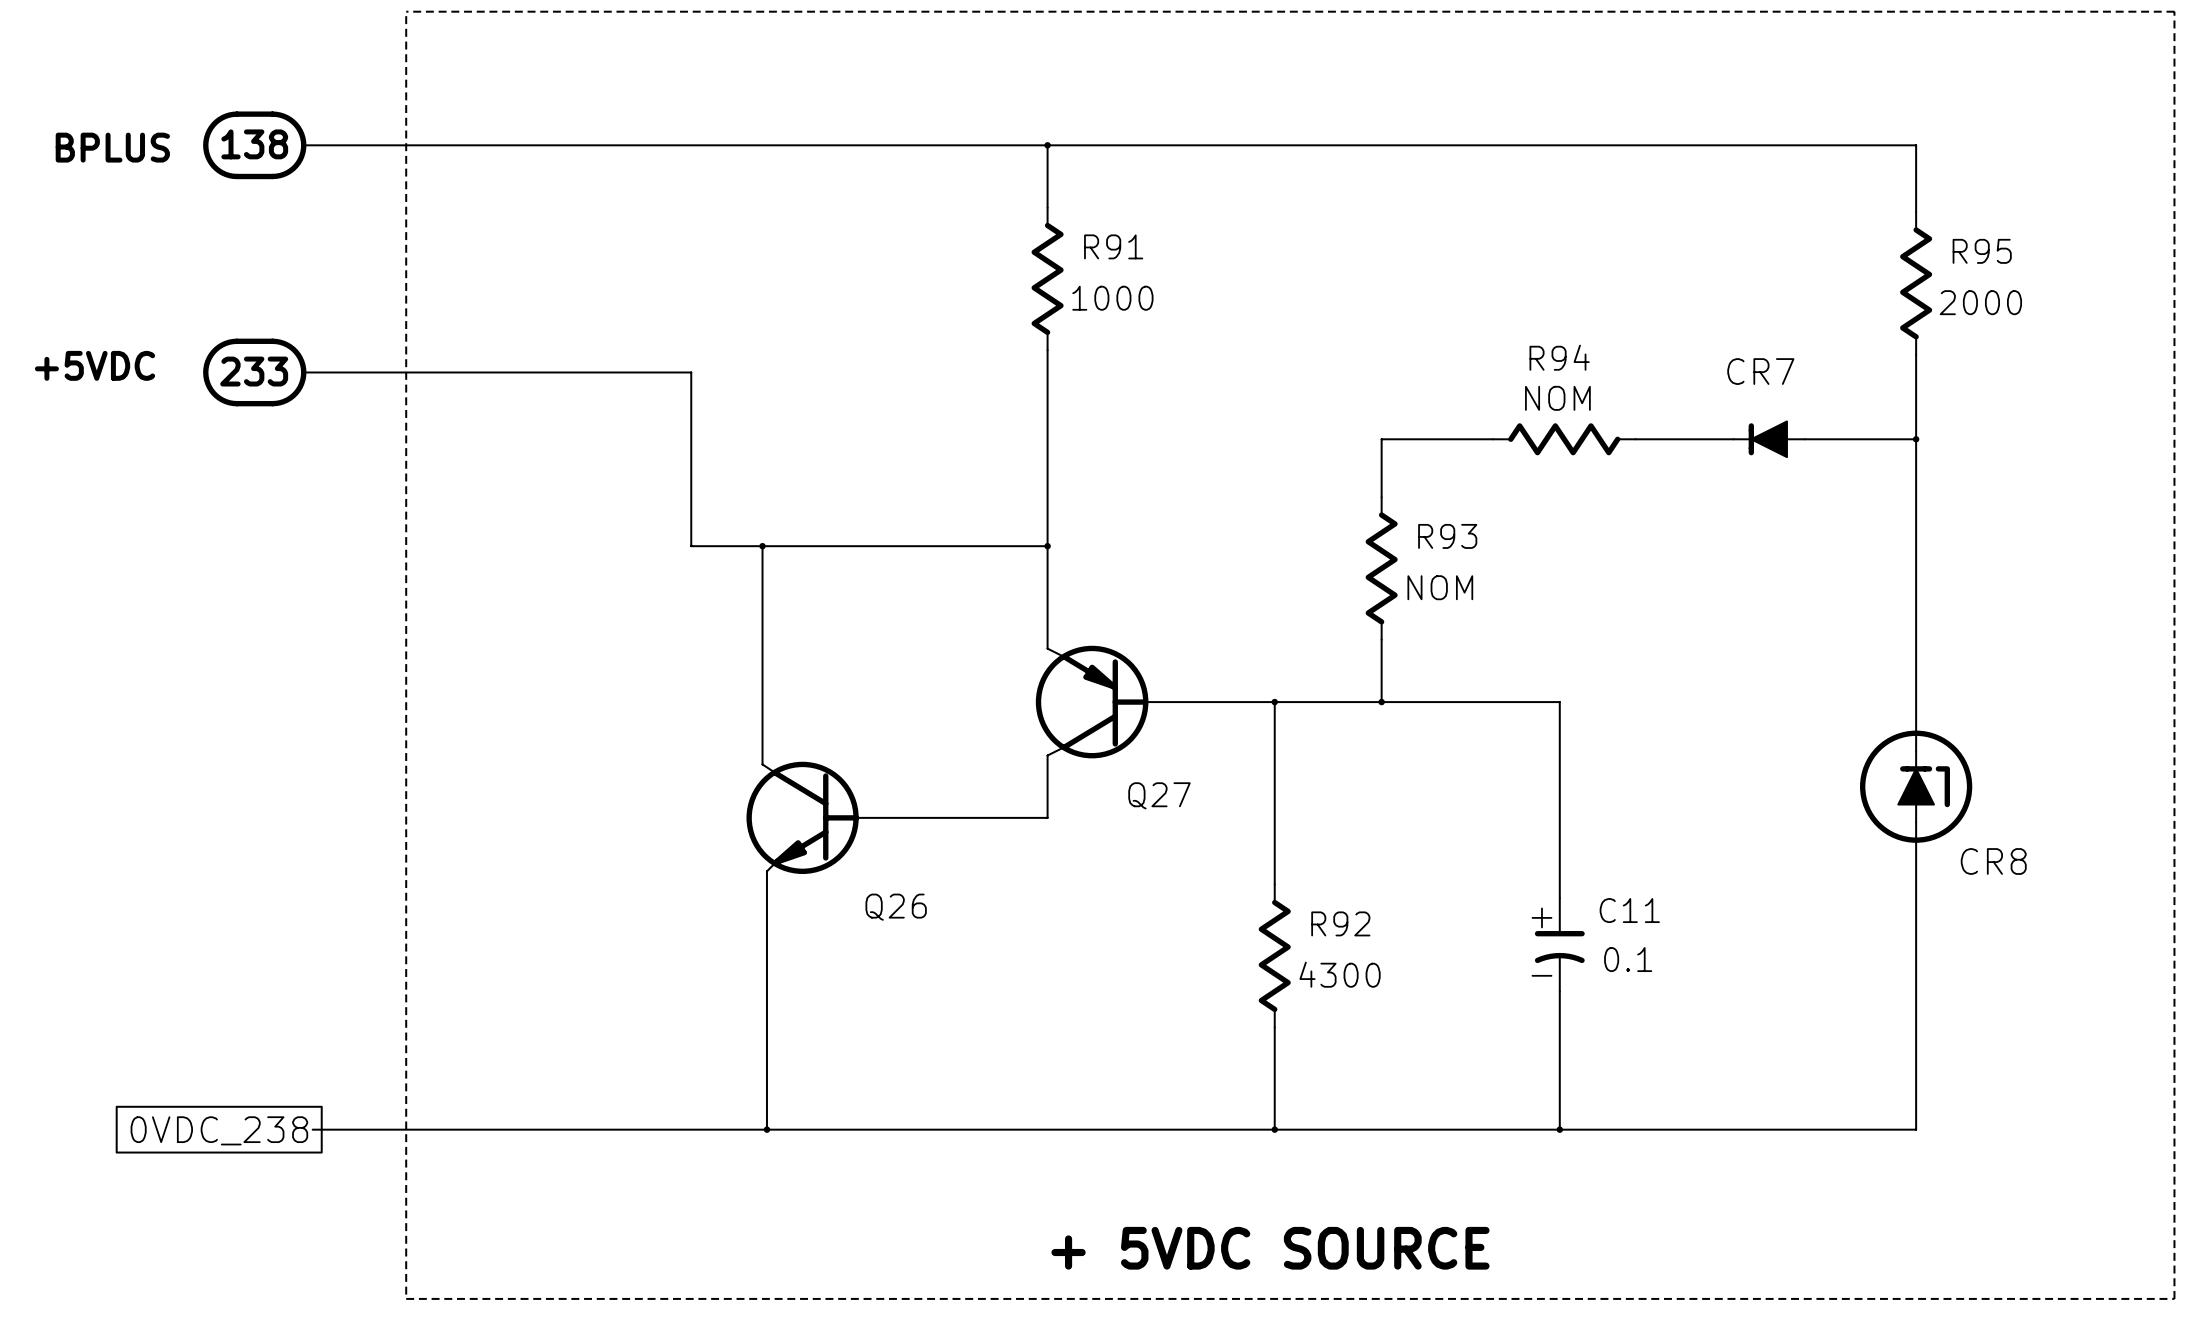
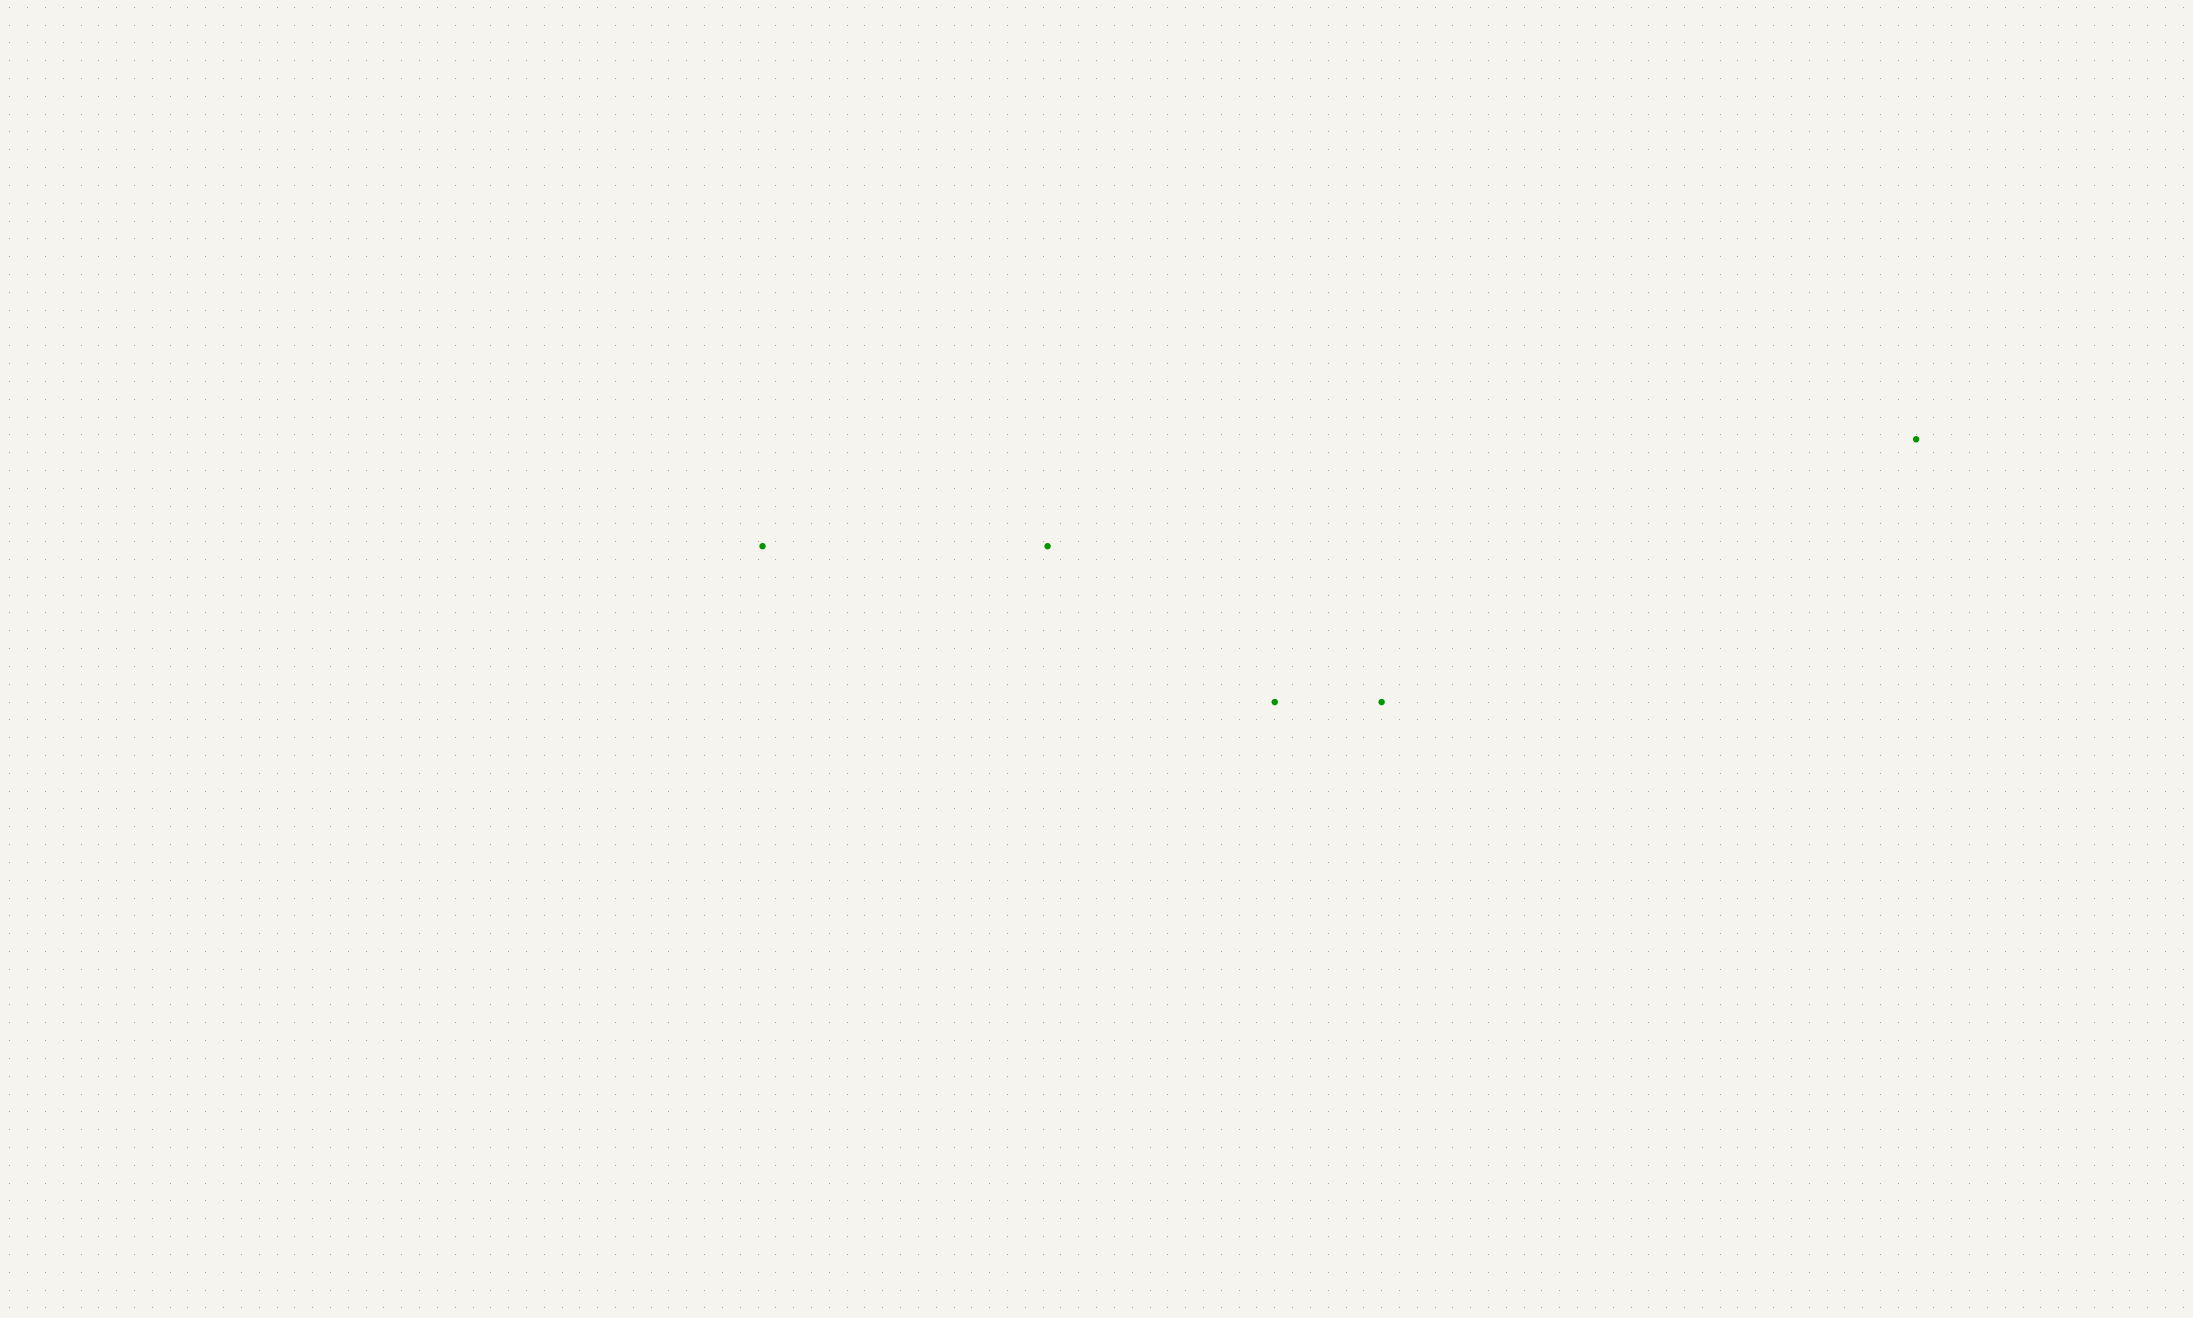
line: (406, 11) (2174, 11) (2174, 1298) (406, 1298) (406, 16) -> none
part: (254, 145) -> none
wire: (303, 145) (1916, 145) (1916, 212) -> none
wire: (1047, 145) (1047, 207) -> none
junction: (1047, 145) -> none
R91: 1000 (1047, 278) -> none
R95: 2000 (1916, 283) -> none
wire: (1047, 350) (1047, 648) (1065, 657) -> none
wire: (1916, 354) (1916, 751) -> none
part: (254, 372) -> none
wire: (303, 372) (691, 372) (691, 546) (1047, 546) -> none
wire: (1492, 439) (1381, 439) (1381, 497) -> none
R94: NOM (1564, 439) -> none
wire: (1635, 439) (1733, 439) -> none
CR7: (1769, 439) -> none
wire: (1804, 439) (1916, 439) -> none
wire: (762, 546) (762, 764) (775, 773) -> none
R93: NOM (1381, 568) -> none
wire: (1381, 639) (1381, 702) -> none
Q27: (1092, 702) -> none
wire: (1145, 702) (1559, 702) (1559, 898) -> none
wire: (1274, 702) (1274, 884) -> none
wire: (1065, 746) (1047, 755) (1047, 817) (856, 817) -> none
CR8: (1916, 786) -> none
Q26: (802, 817) -> none
wire: (1916, 822) (1916, 1129) (312, 1129) -> none
wire: (775, 862) (766, 871) (766, 1129) -> none
C11: 0.1 (1559, 944) -> none
R92: 4300 (1274, 955) -> none
wire: (1559, 991) (1559, 1129) -> none
wire: (1274, 1027) (1274, 1129) -> none
junction: (766, 1129) -> none
junction: (1274, 1129) -> none
junction: (1559, 1129) -> none
global label: 0VDC_238 (219, 1130) -> none
text: + 5VDC SOURCE (1270, 1248) -> none

